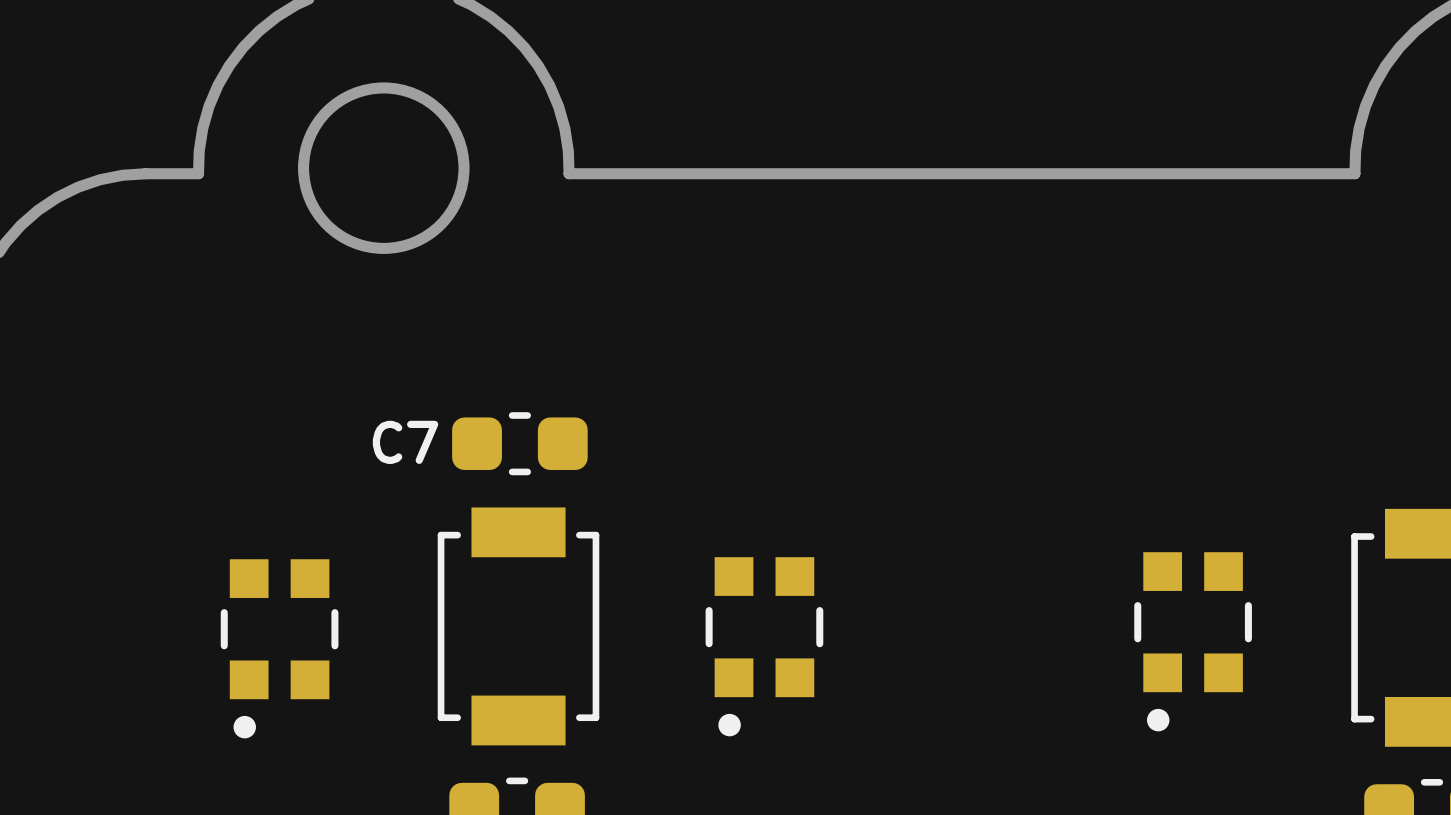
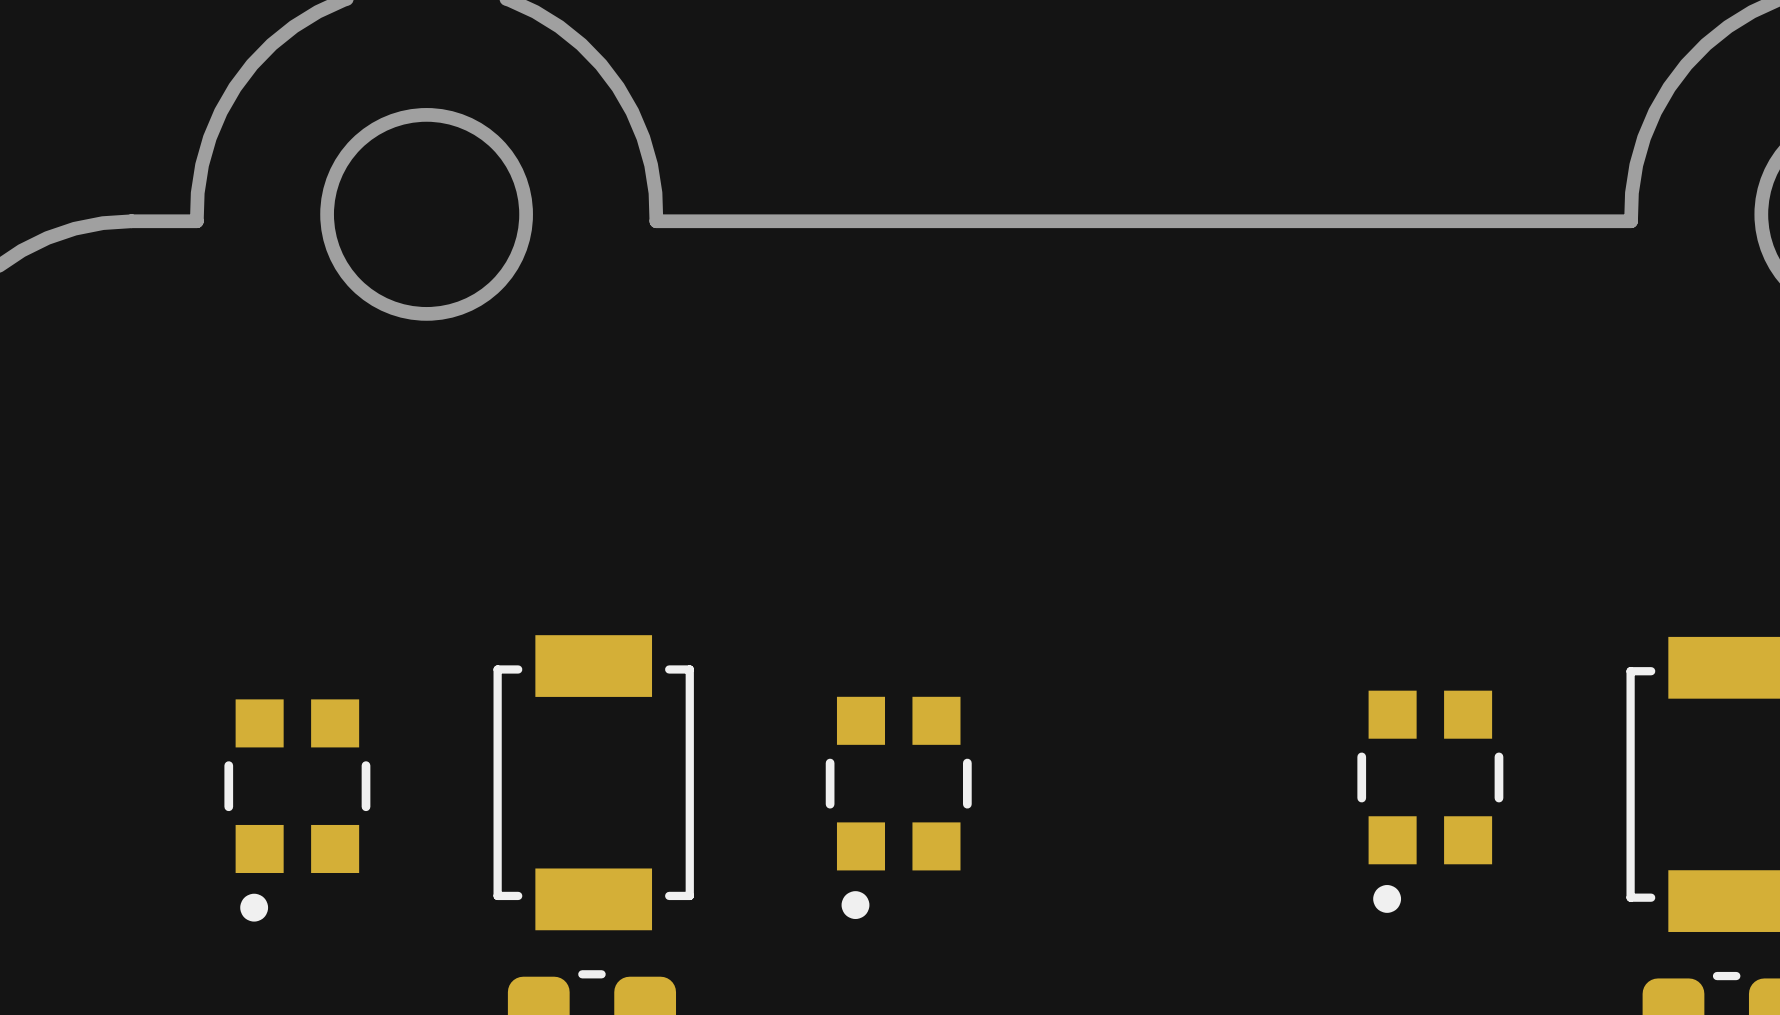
C7: (519, 443) -> none

